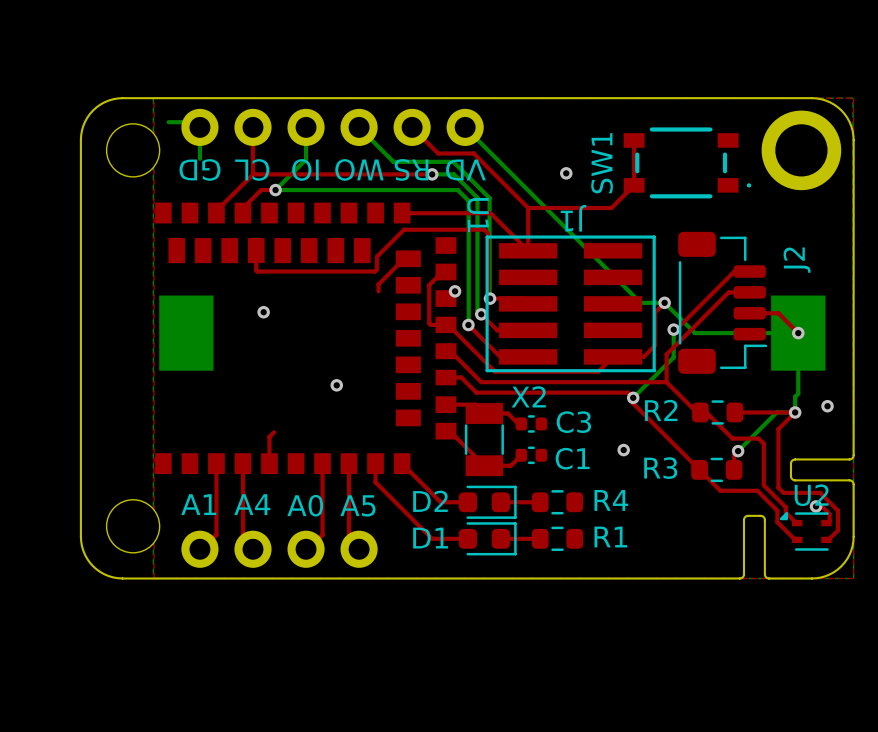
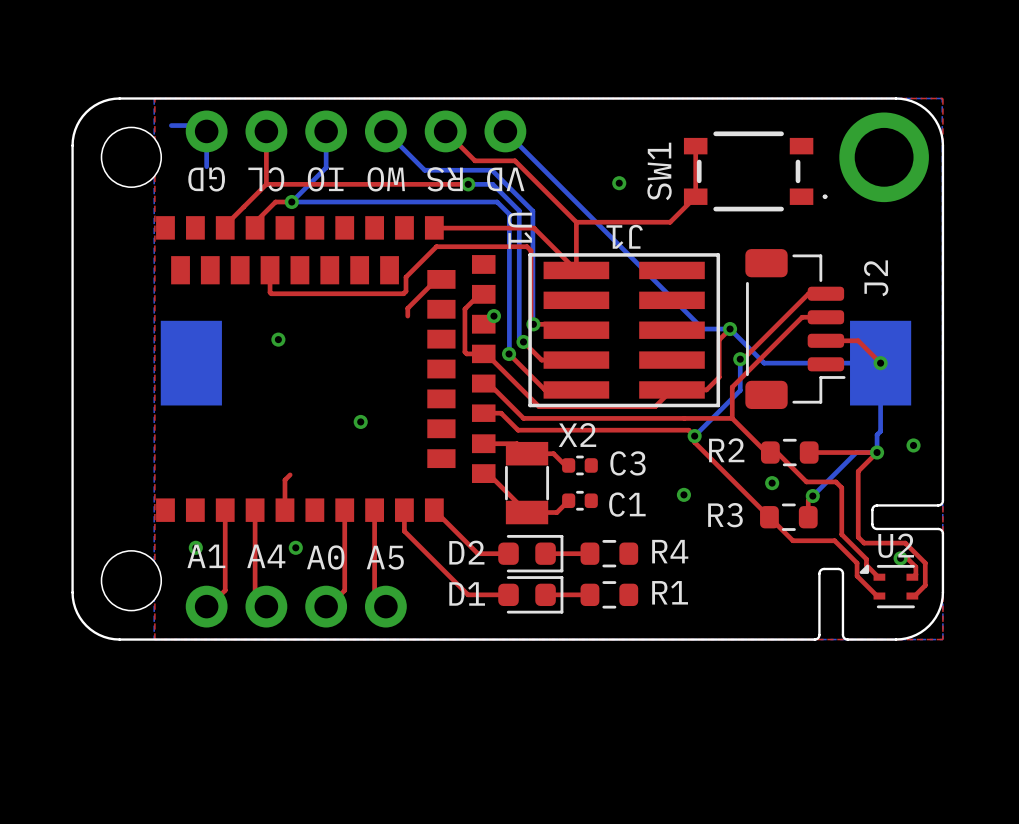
via: none -> (772, 483)
via: none -> (195, 547)
via: none -> (295, 547)

